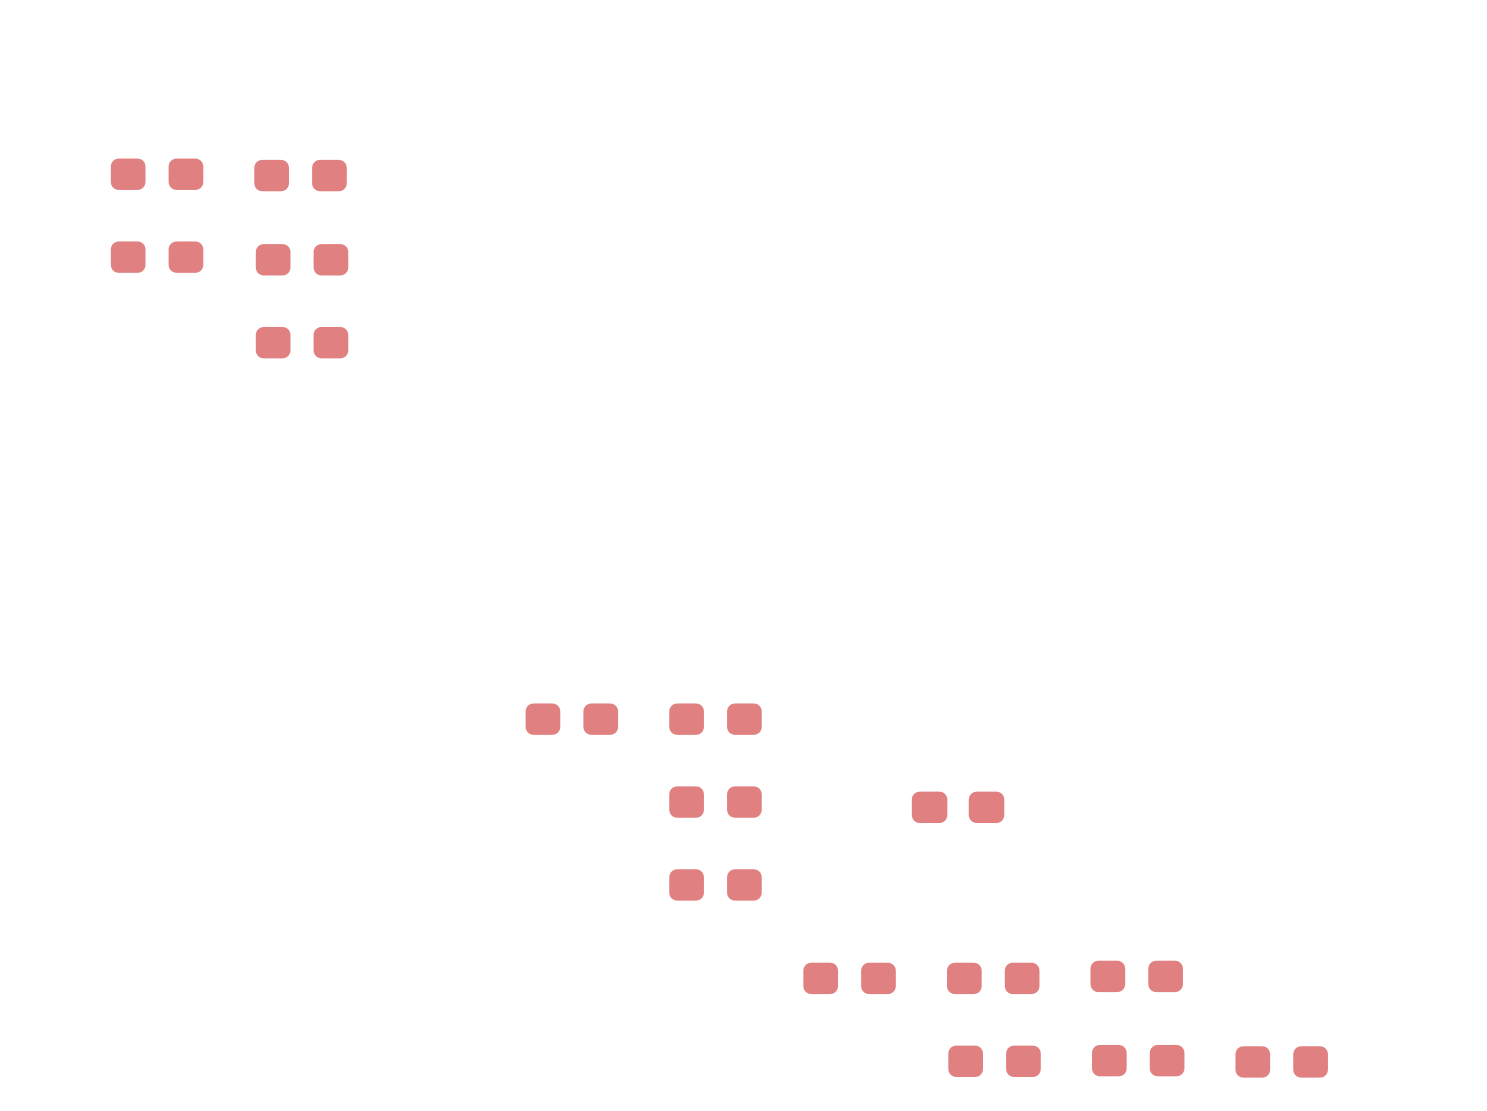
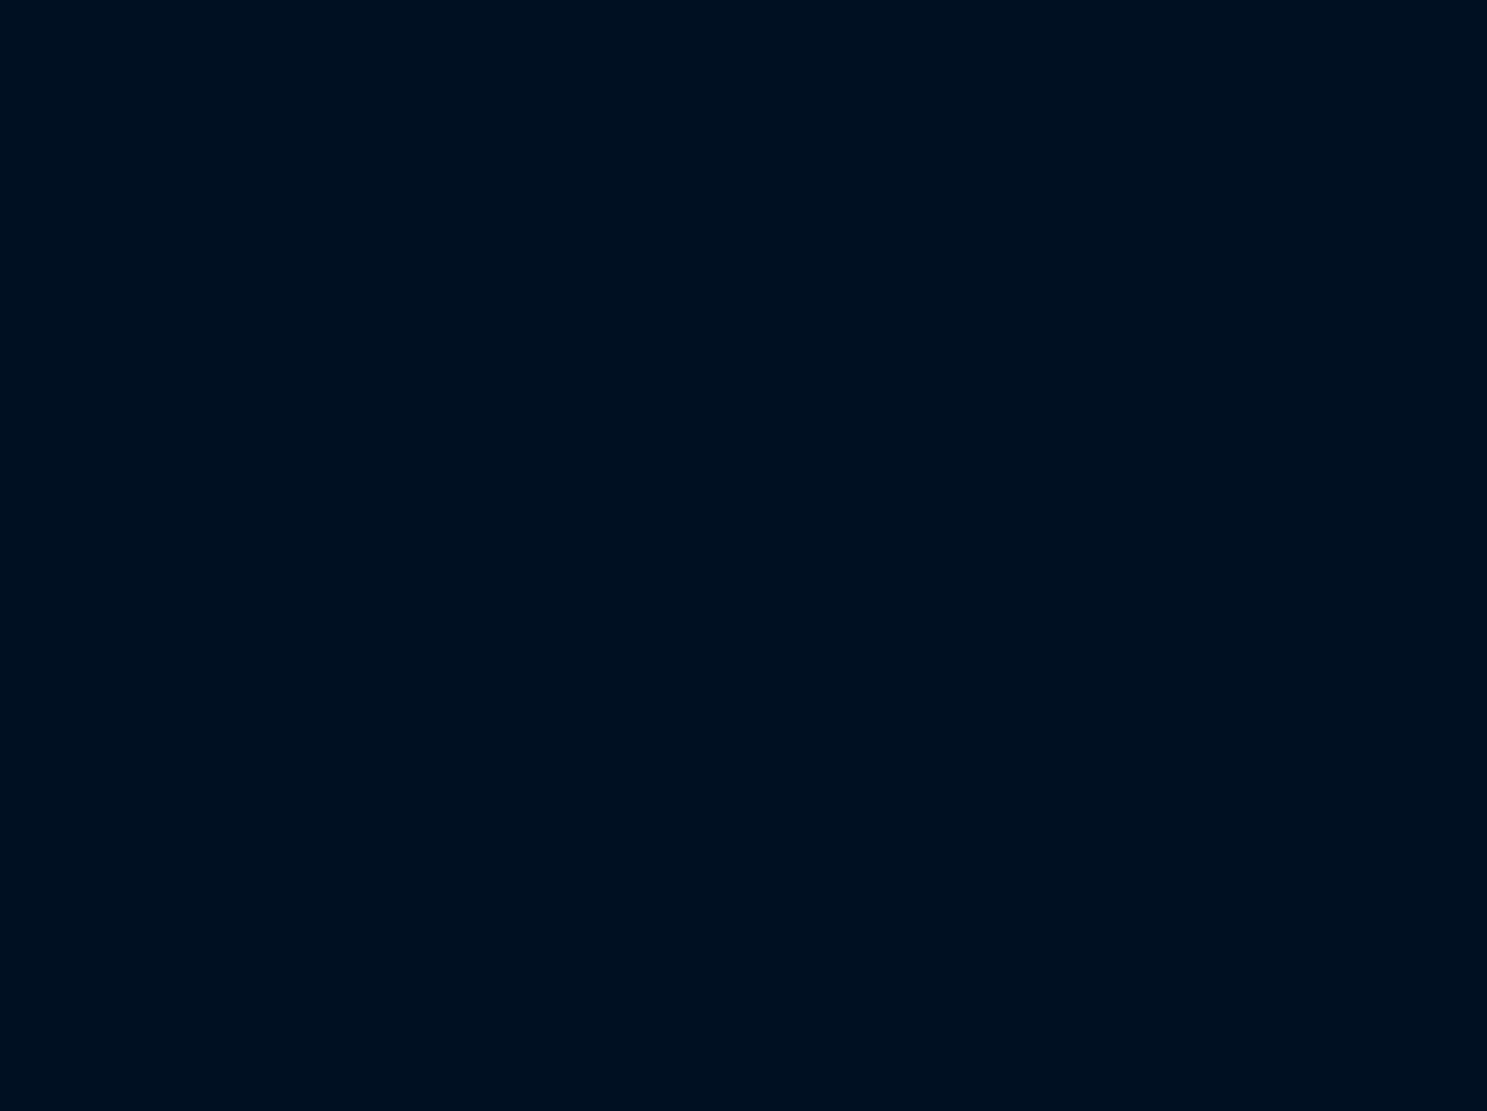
part: (157, 174) -> none
part: (300, 175) -> none
part: (157, 257) -> none
part: (302, 259) -> none
part: (302, 342) -> none
part: (571, 719) -> none
part: (715, 719) -> none
part: (715, 802) -> none
part: (958, 807) -> none
part: (715, 884) -> none
part: (1136, 976) -> none
part: (849, 978) -> none
part: (993, 978) -> none
part: (1138, 1060) -> none
part: (994, 1061) -> none
part: (1281, 1061) -> none

